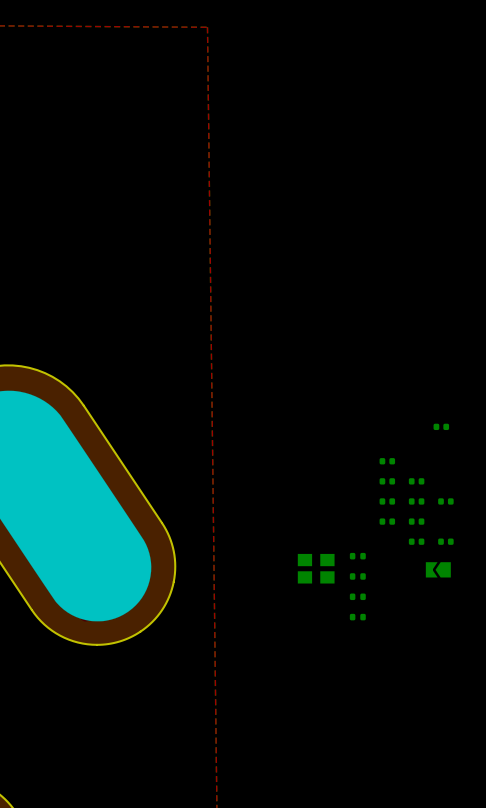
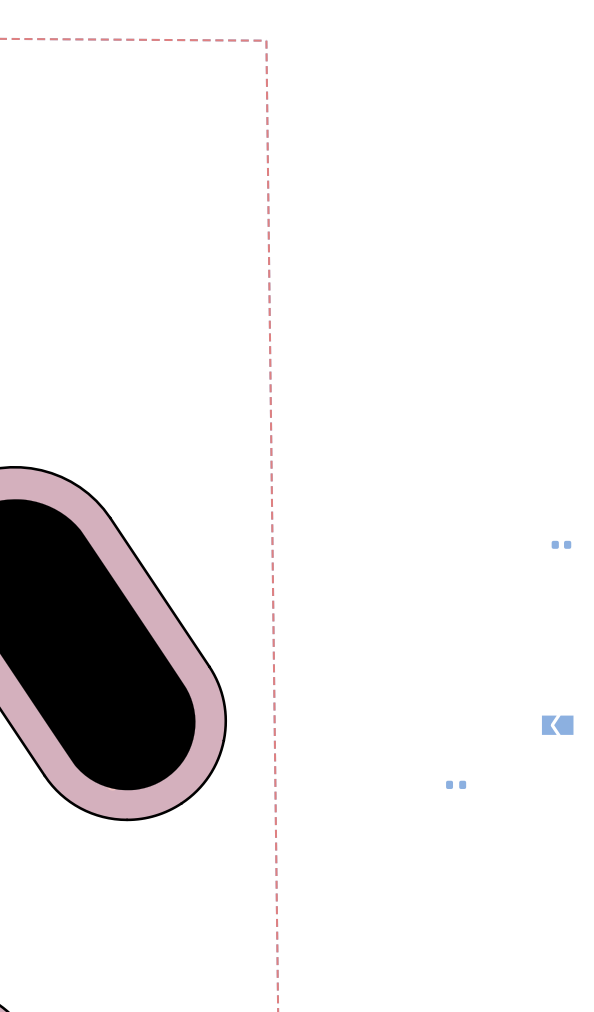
part: (387, 461) -> none
part: (387, 481) -> none
part: (416, 481) -> none
part: (387, 501) -> none
part: (416, 501) -> none
part: (445, 501) -> none
part: (387, 521) -> none
part: (416, 521) -> none
part: (416, 541) -> none
part: (445, 541) -> none
part: (357, 556) -> none
part: (316, 568) -> none
part: (357, 576) -> none
part: (357, 596) -> none

